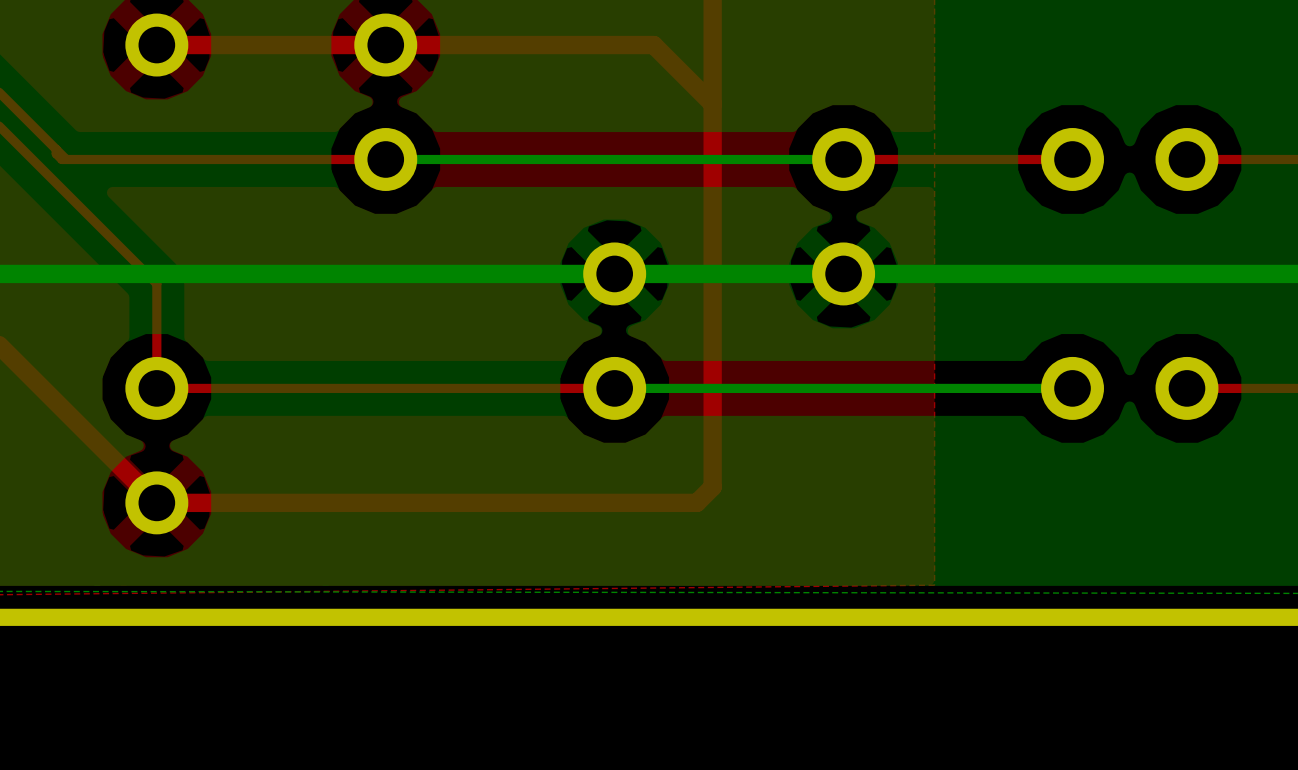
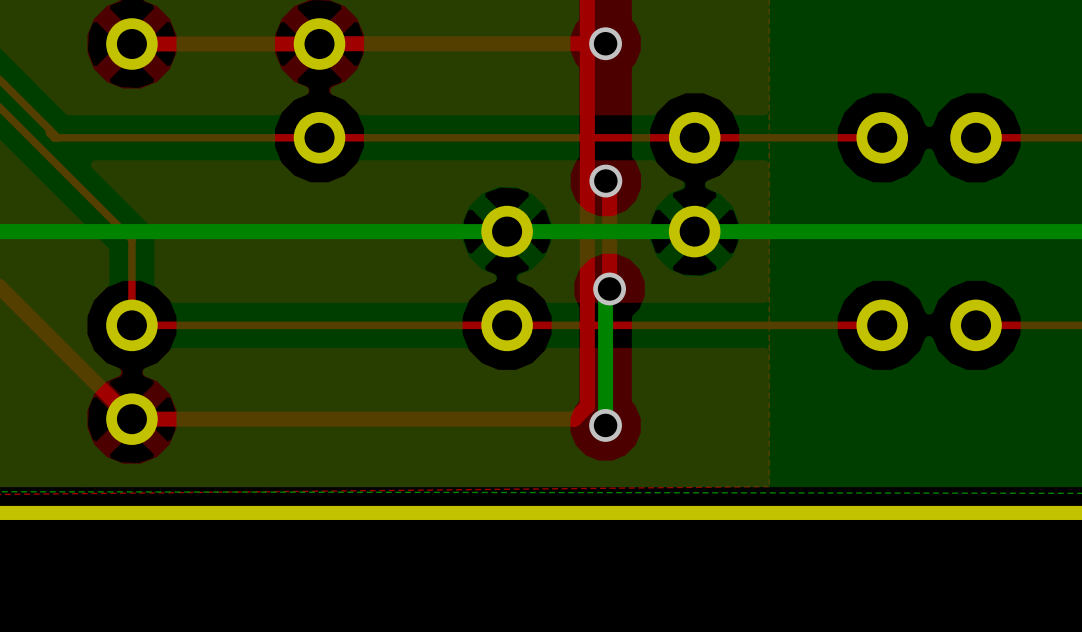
via: none -> (605, 43)
top track: (385, 45) (653, 45) (712, 103) -> (319, 43) (605, 43)
top track: none -> (694, 137) (319, 137)
bottom track: (843, 159) (385, 159) -> none
top track: none -> (605, 181) (609, 184) (609, 288)
via: none -> (605, 181)
bottom track: none -> (609, 288) (605, 293) (605, 425)
via: none -> (609, 288)
top track: none -> (882, 325) (507, 325)
bottom track: (1072, 388) (614, 388) -> none
via: none -> (605, 425)

